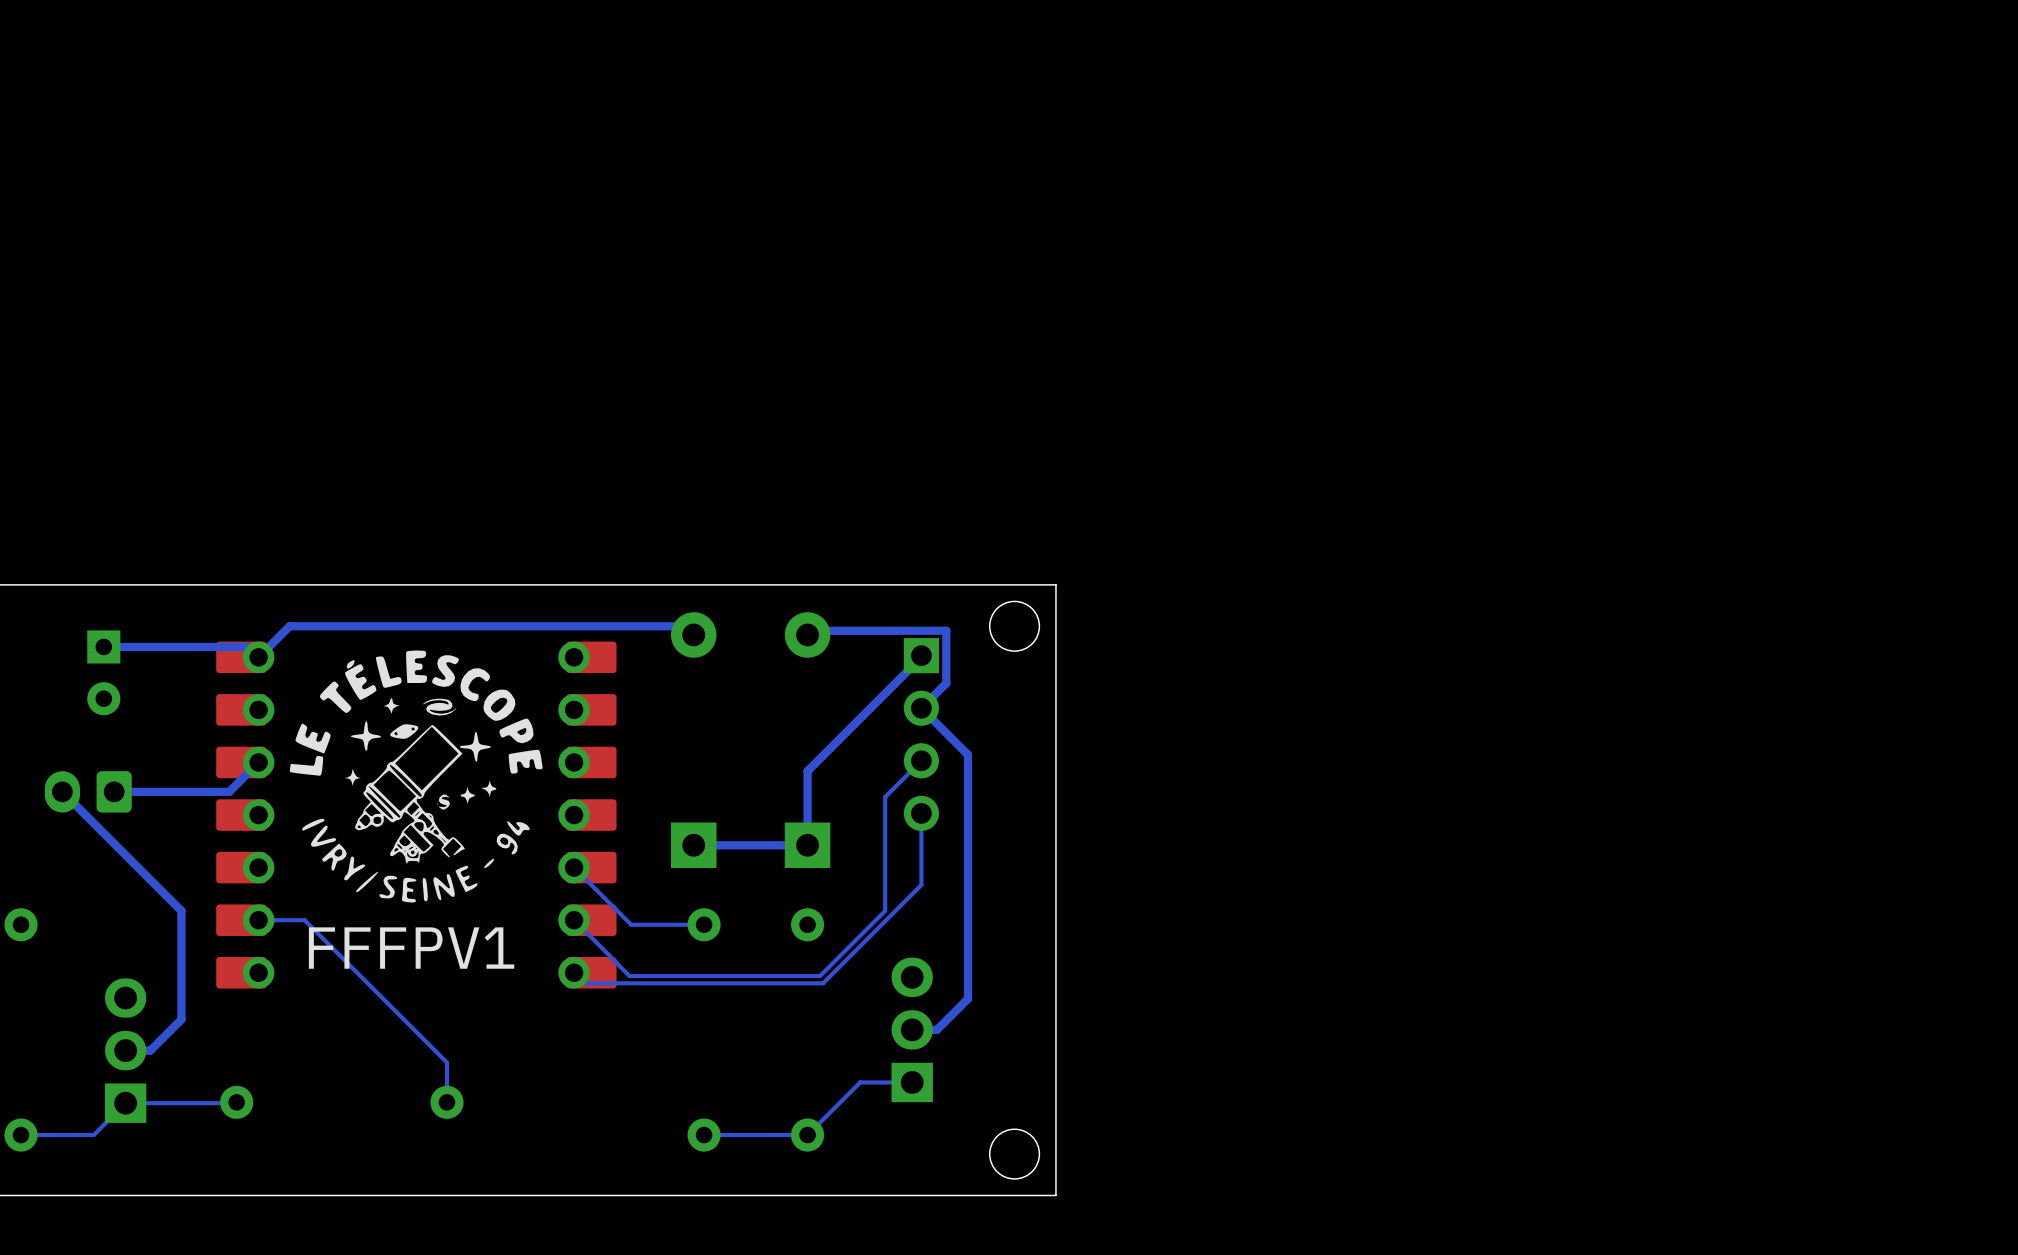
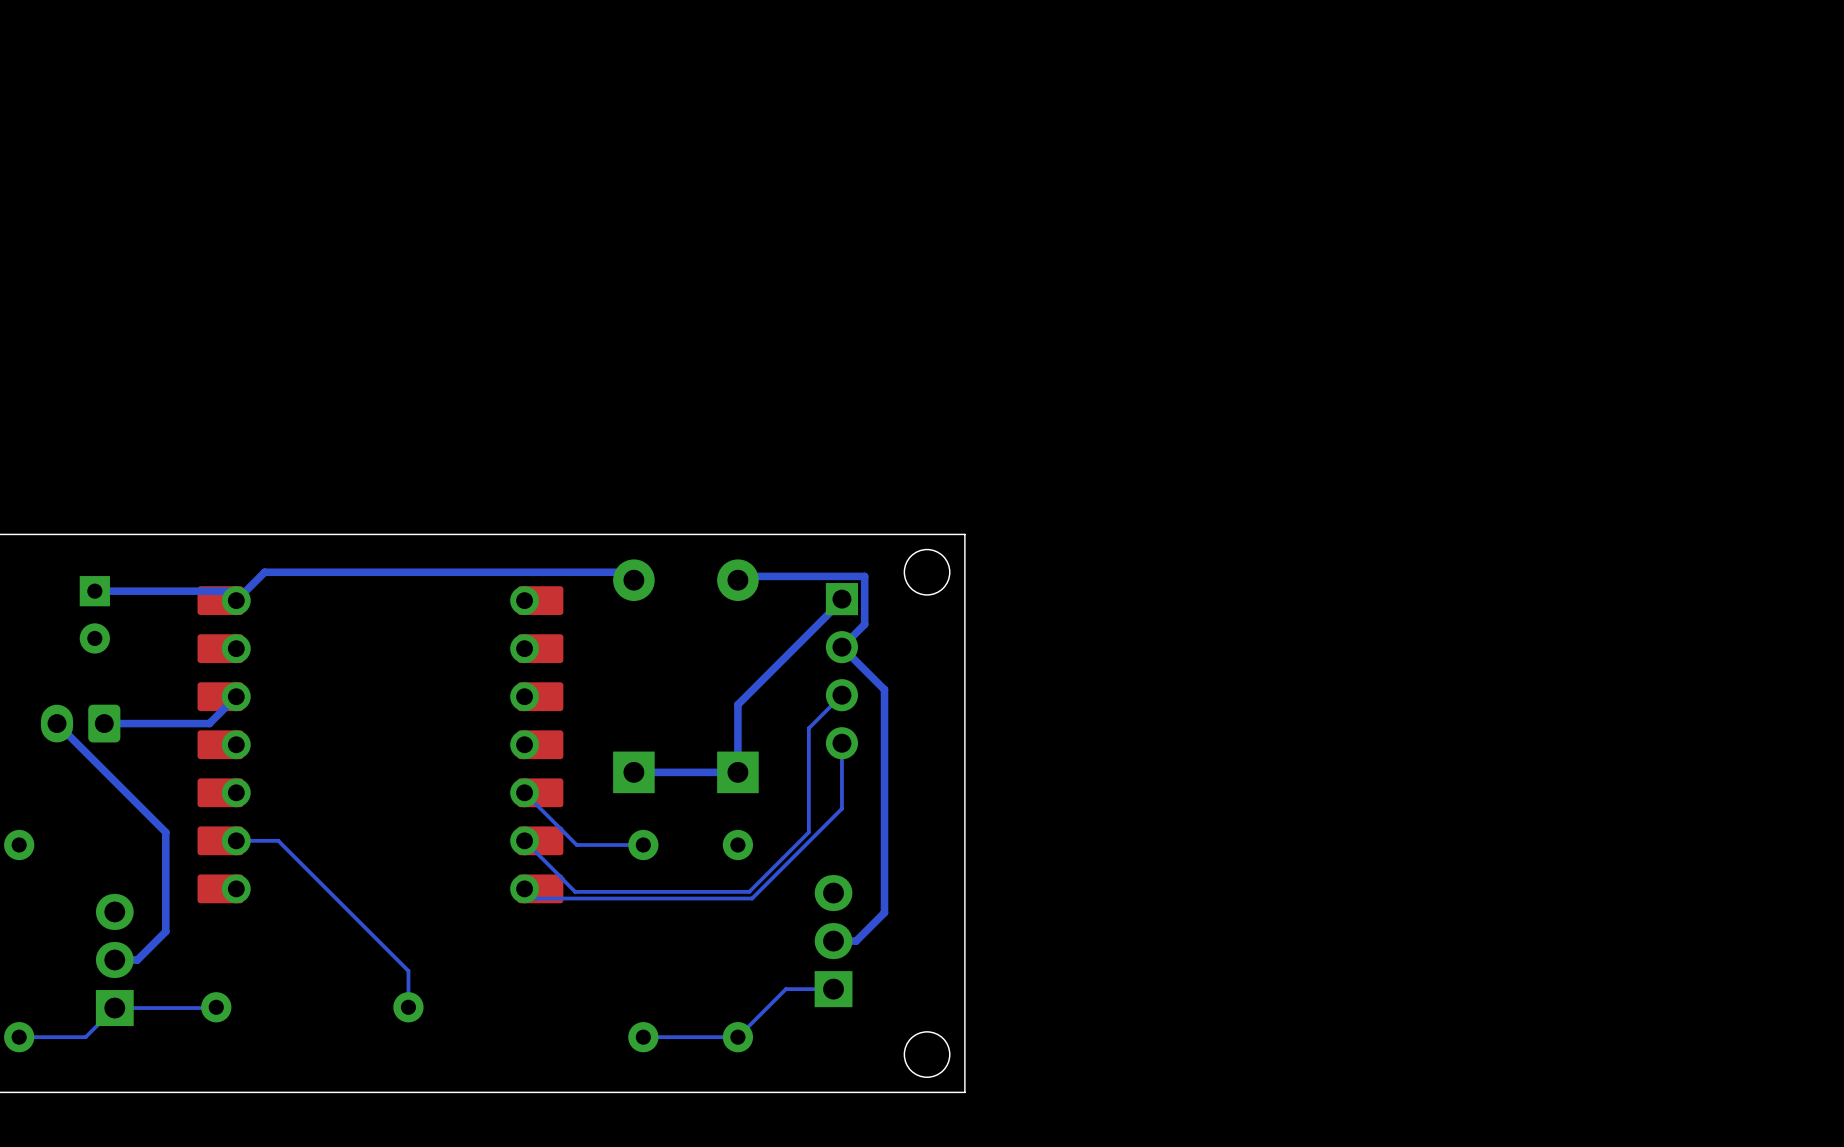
drawing: [289, 650, 543, 903] -> none
text: FFFPV1 (411, 948) -> none

